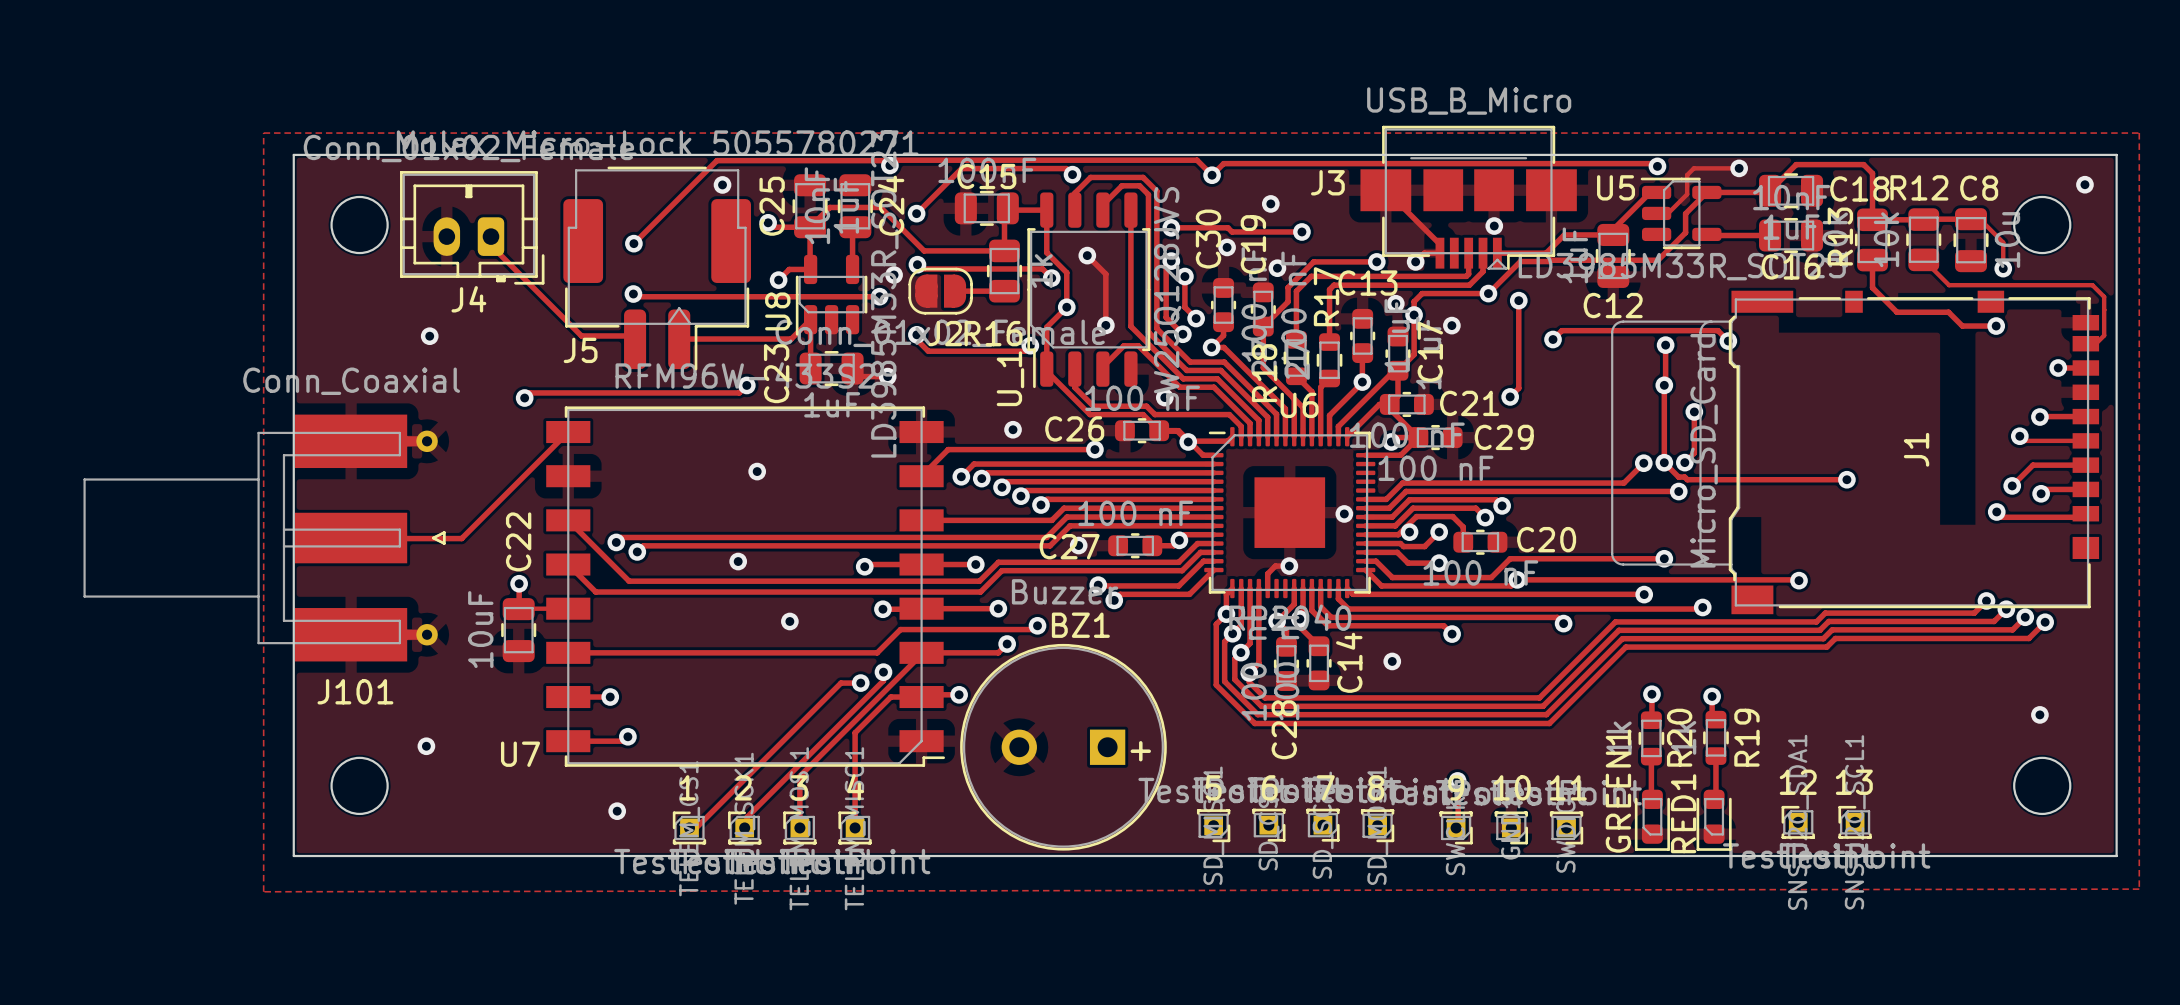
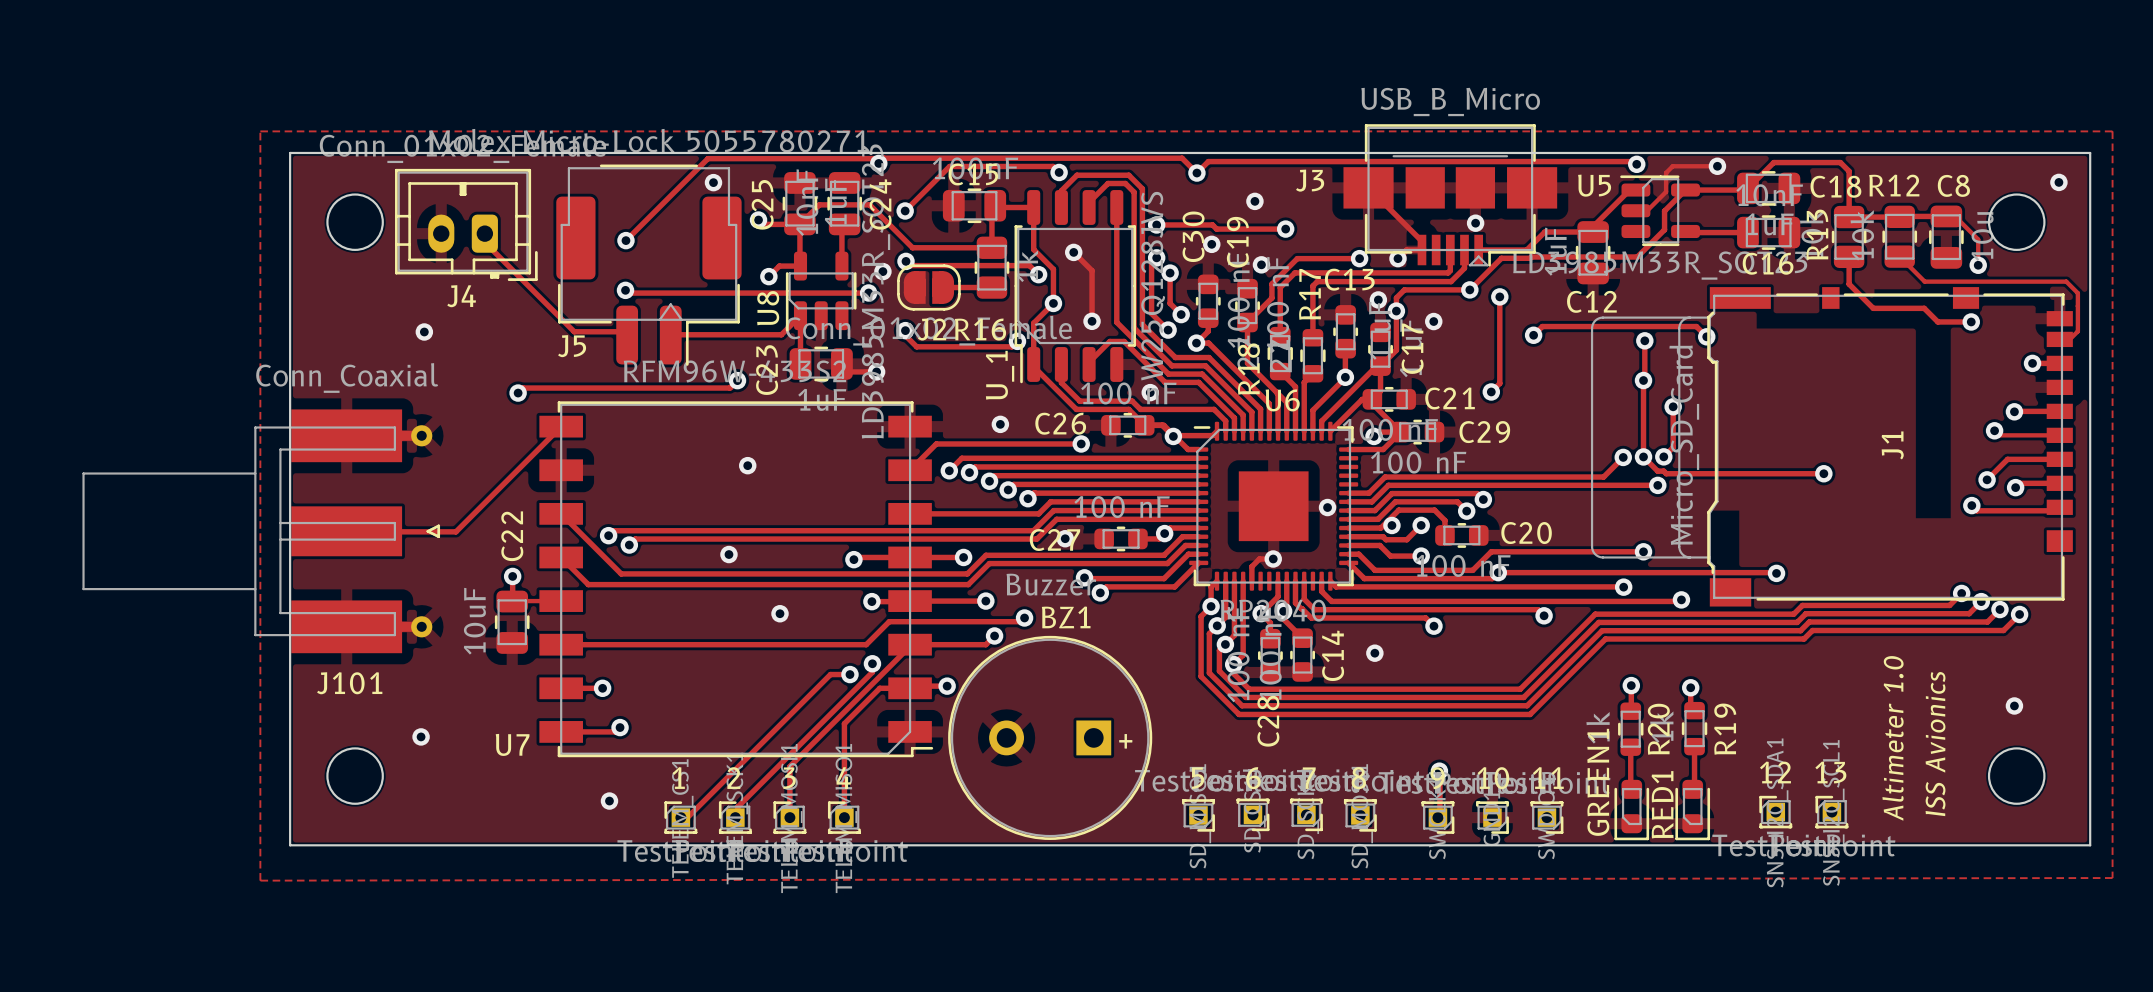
text: none -> Altimeter 1.0 (1893, 738)
text: none -> ISS Avionics (1935, 744)

